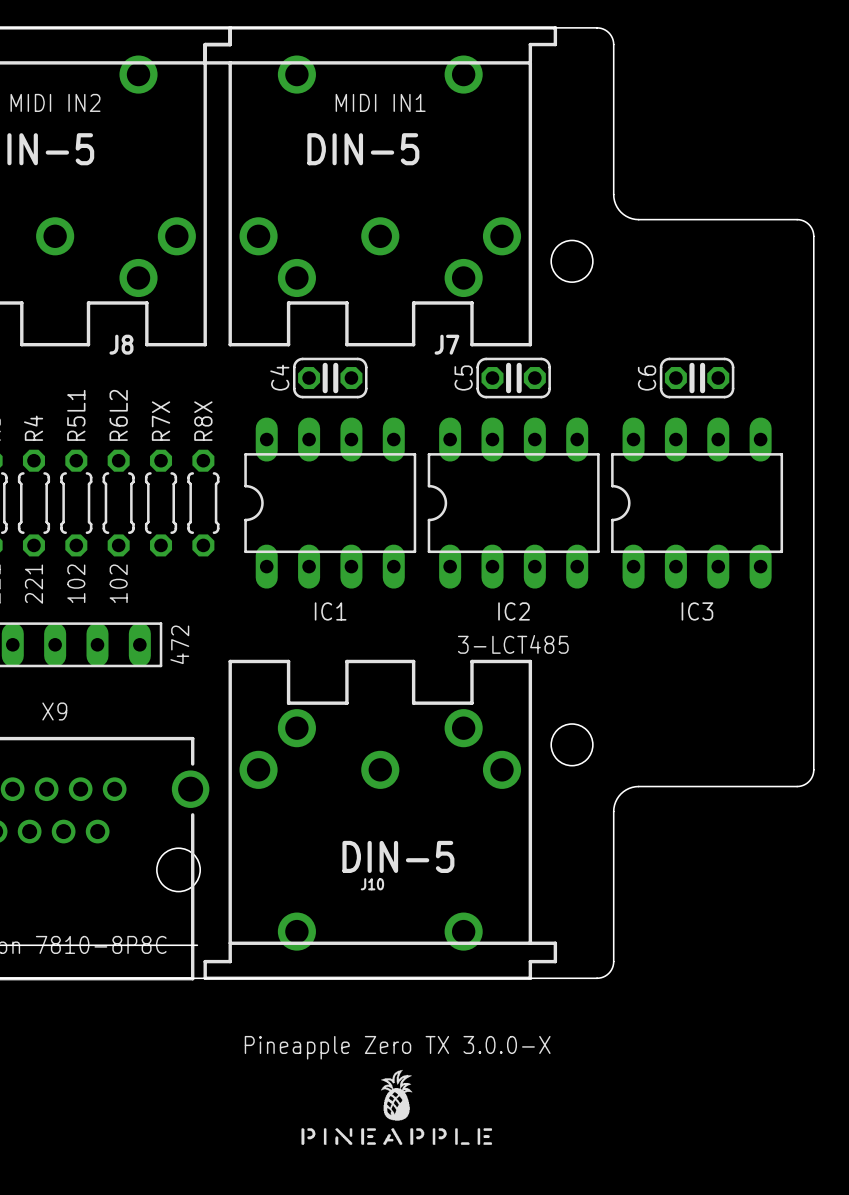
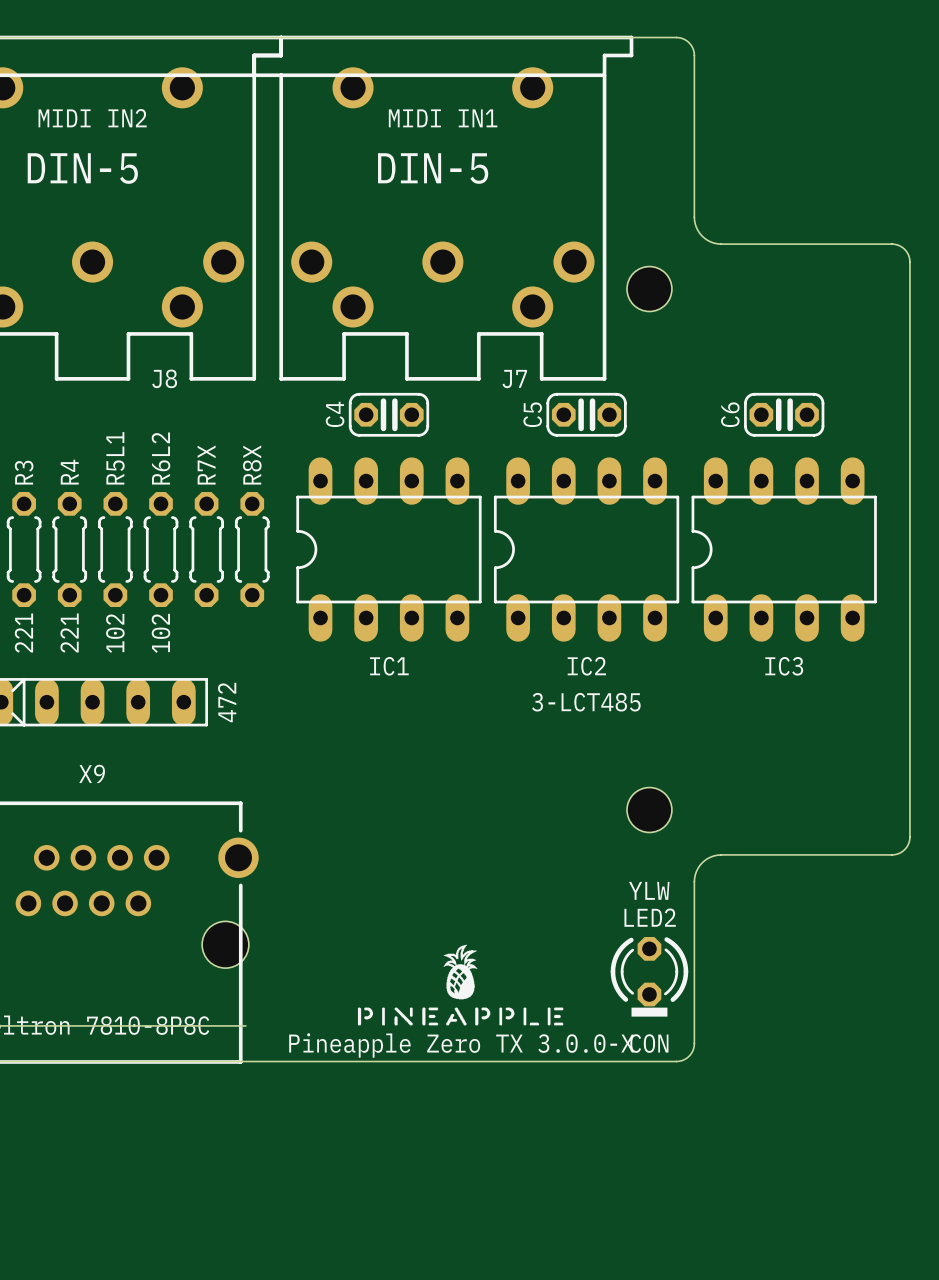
J10: (380, 819) -> none
text: none -> YLW (649, 890)
LED2: none -> (649, 971)
drawing: none -> [631, 1007, 668, 1017]
text: none -> CON (649, 1043)
text position: Pineapple Zero TX 3.0.0-X (397, 1047) -> Pineapple Zero TX 3.0.0-X (461, 1045)
drawing position: (396, 1107) -> (460, 984)

